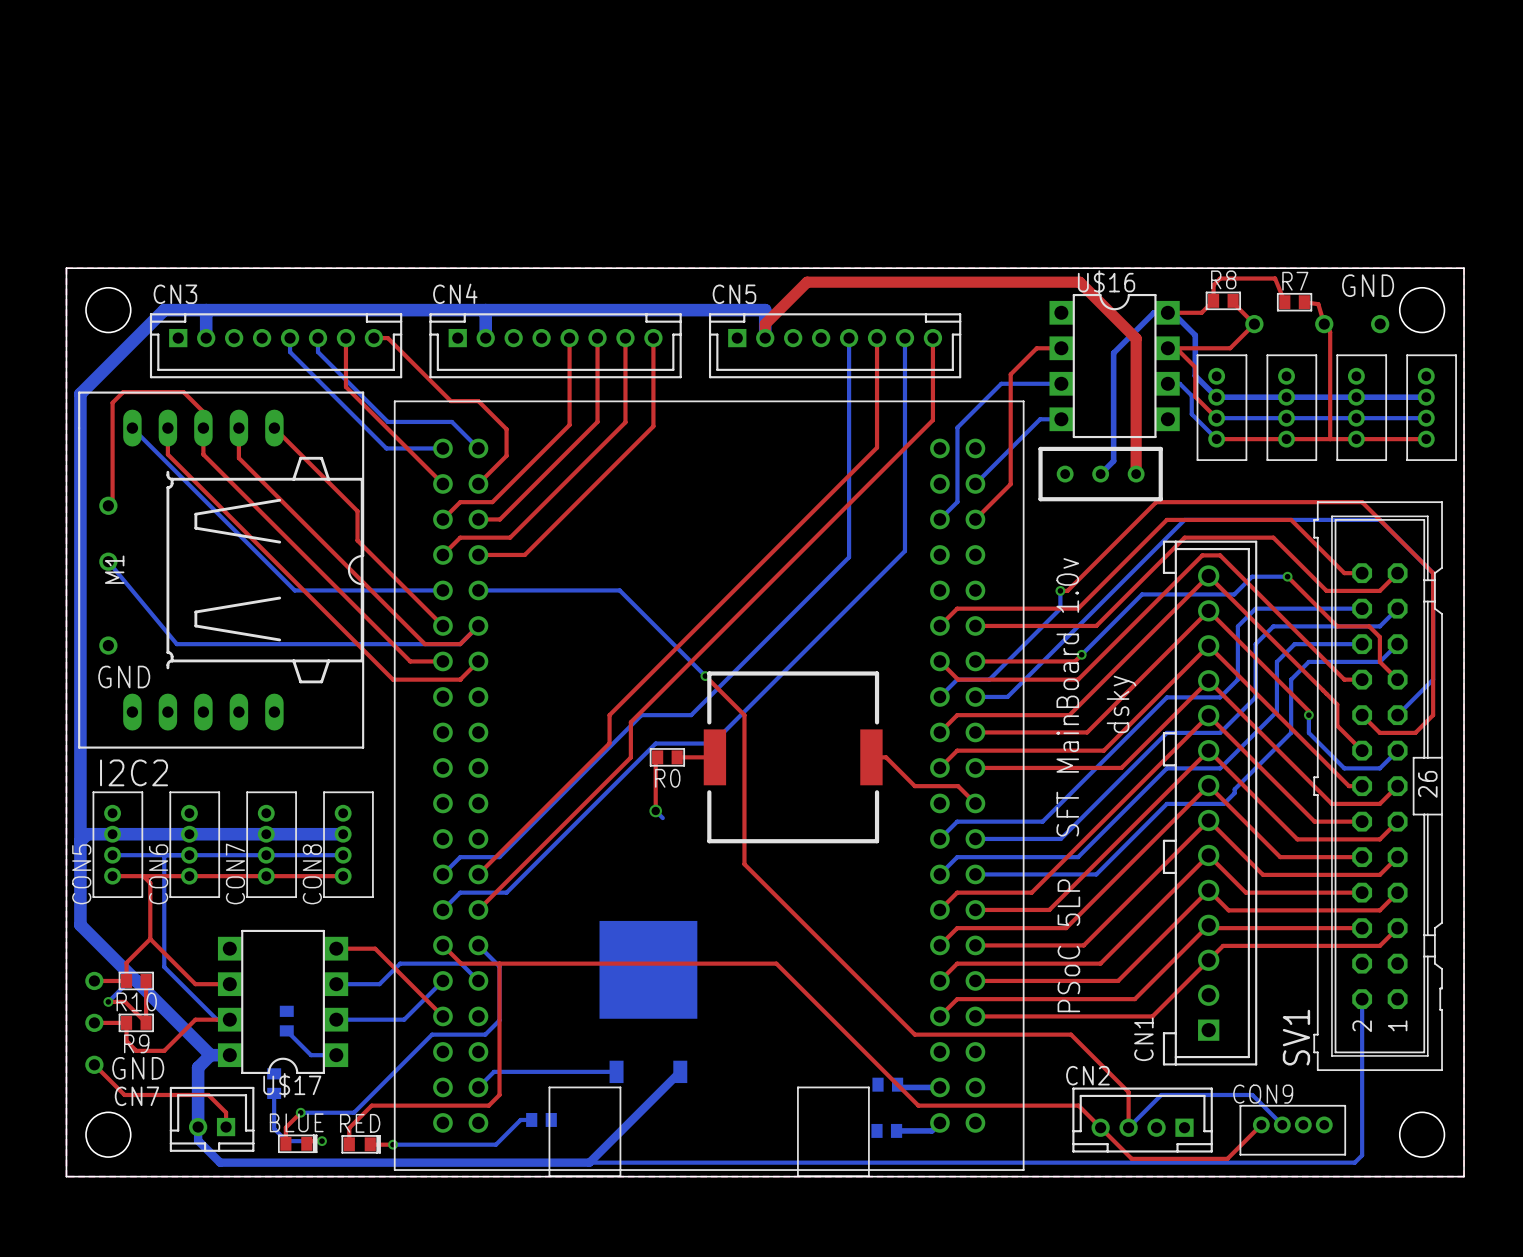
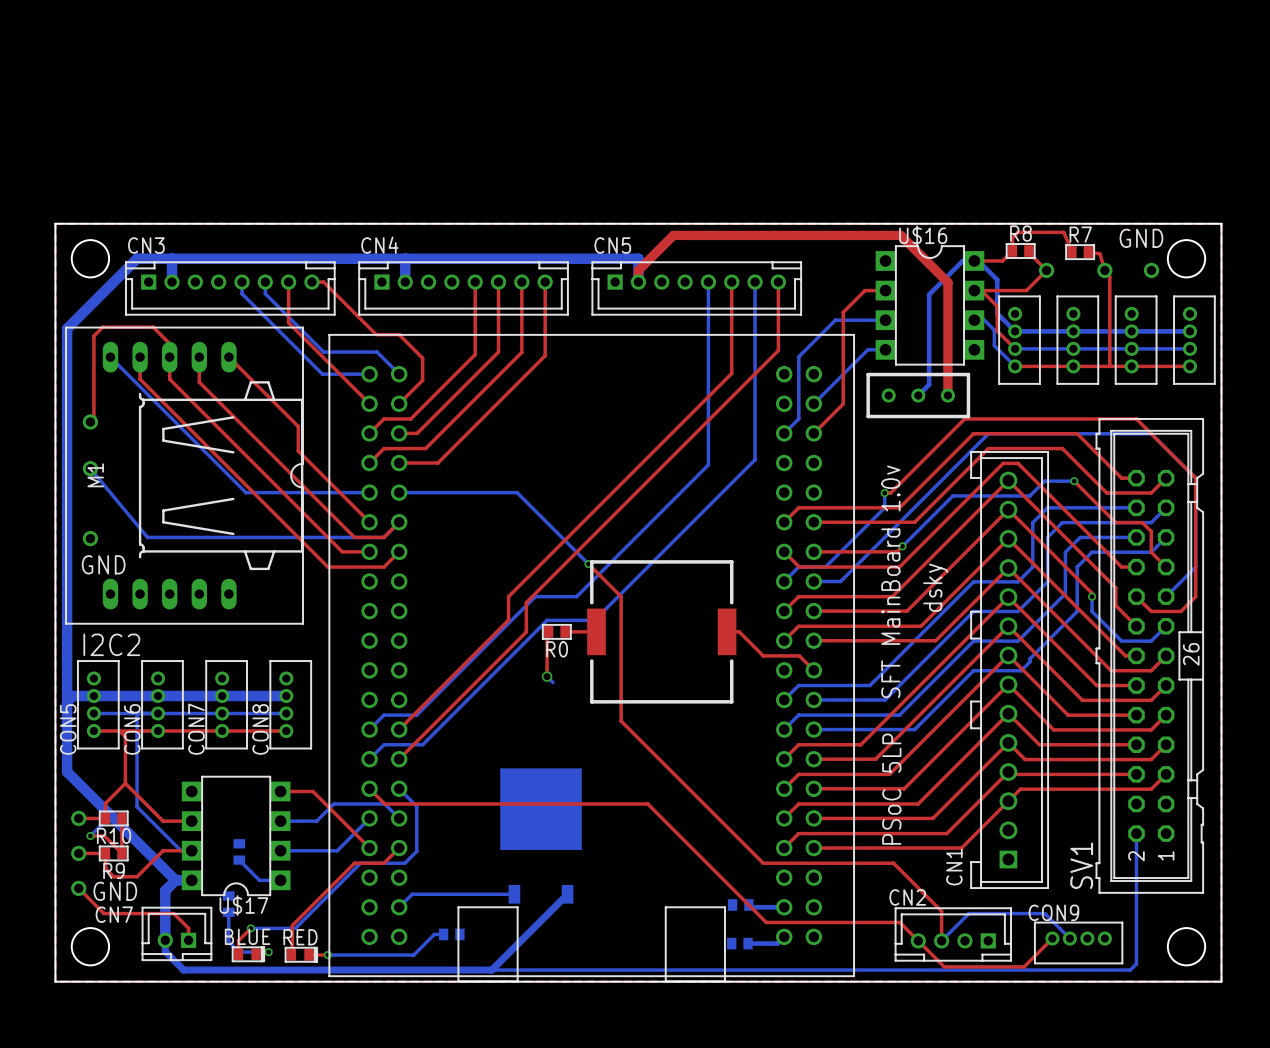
top track: (499, 963) (499, 1094) (488, 1105) (371, 1105) (349, 1128) (349, 1144) -> (399, 848) (384, 863) (354, 863) (292, 925) (291, 954)

